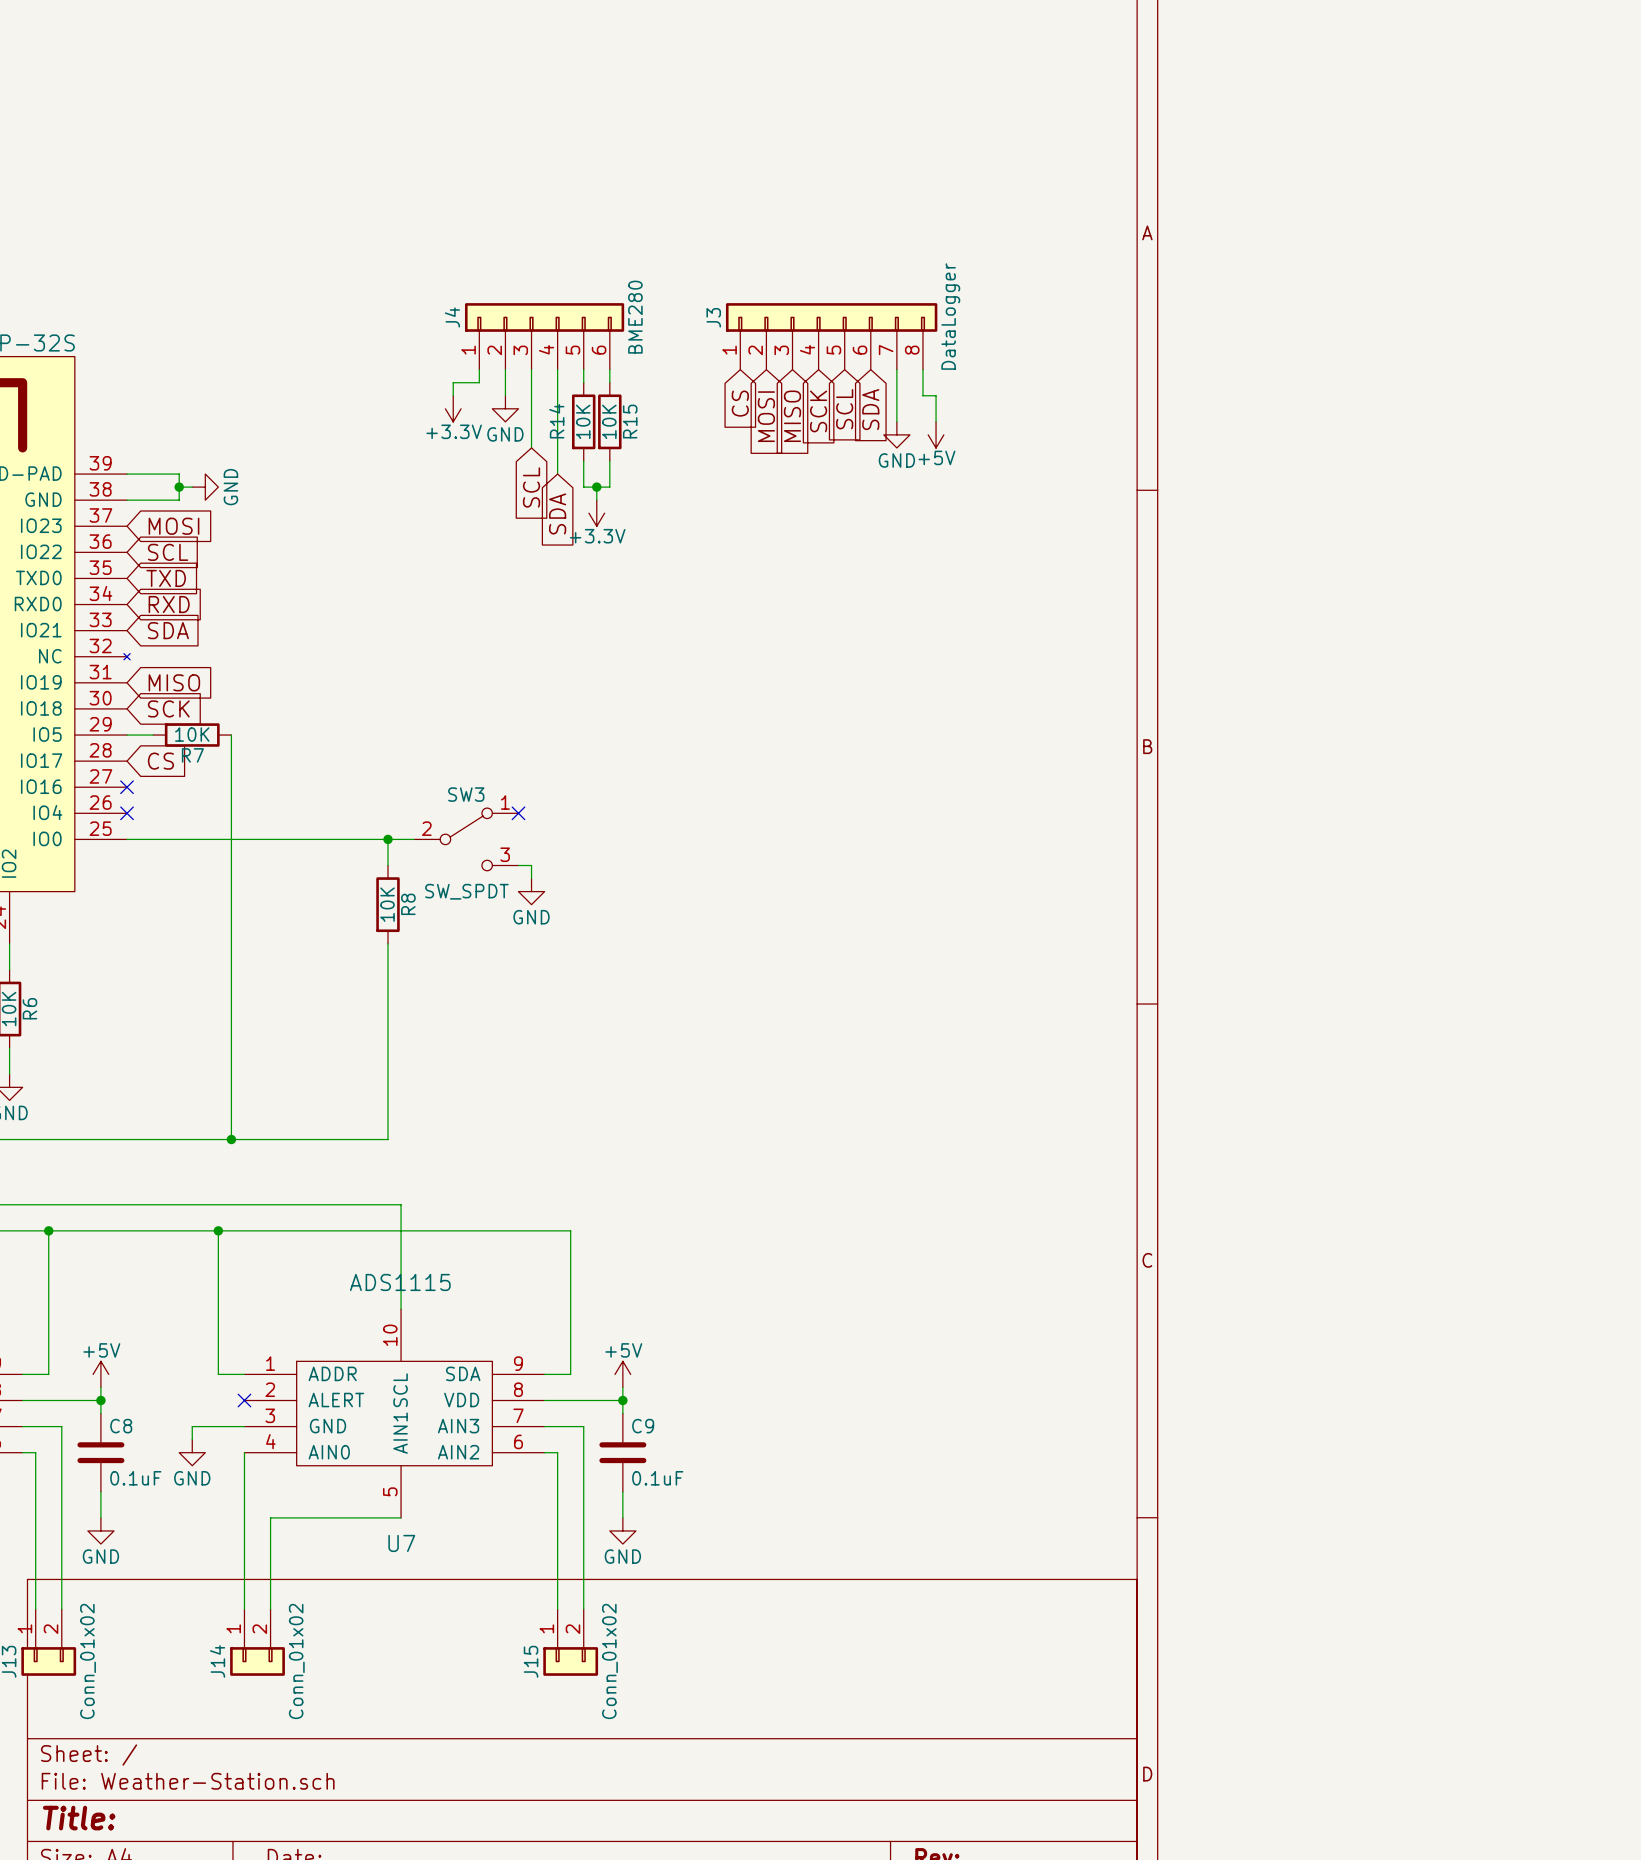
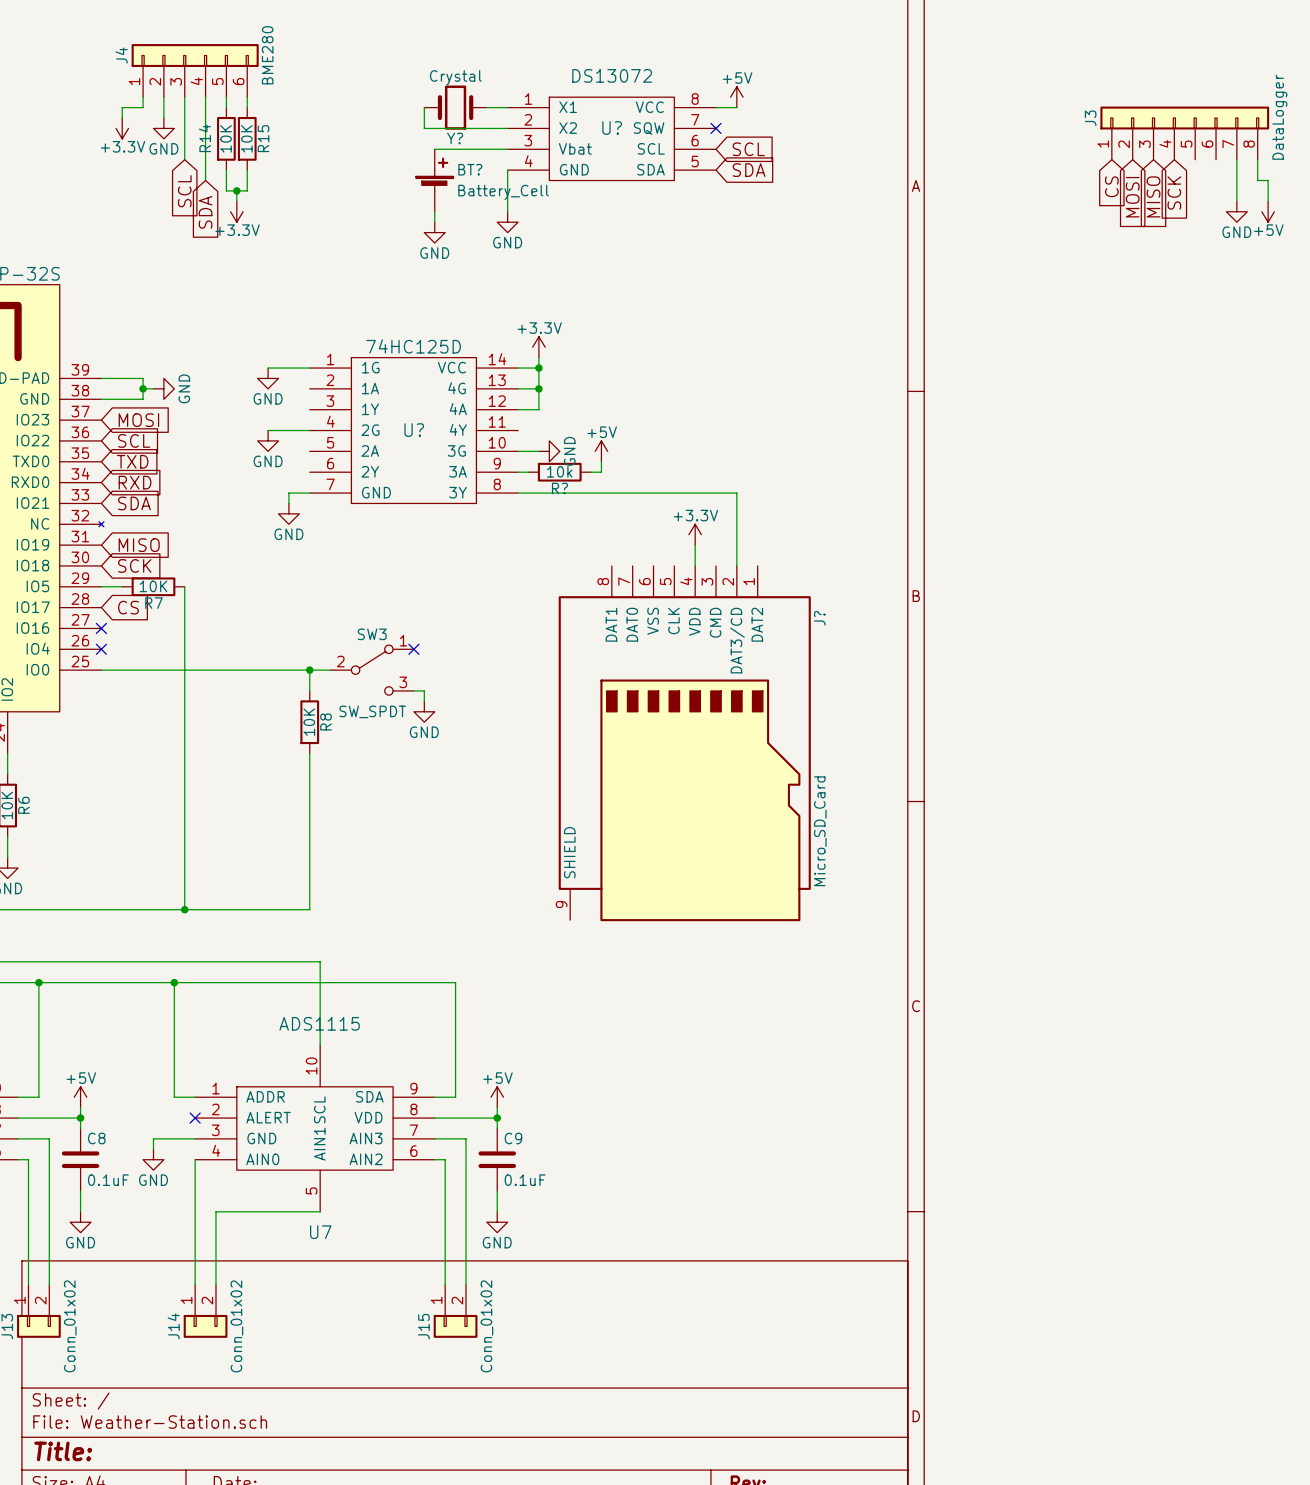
wire: none -> (143, 97) (143, 107) (122, 107) (122, 118)
wire: none -> (163, 97) (163, 118)
wire: none -> (184, 97) (184, 159)
wire: none -> (205, 97) (205, 180)
wire: none -> (226, 97) (226, 107)
wire: none -> (247, 97) (247, 107)
power symbol: none -> +5V (736, 97)
wire: none -> (424, 107) (424, 128) (507, 128)
Y?: none -> Crystal (455, 107)
wire: none -> (486, 107) (507, 107)
wire: none -> (716, 107) (736, 107)
power symbol: none -> +3.3V (122, 128)
power symbol: none -> GND (163, 128)
no-connect mark: none -> (716, 128)
U?: none -> DS13072 (611, 138)
wire: none -> (434, 149) (507, 149)
wire: none -> (1236, 159) (1236, 201)
wire: none -> (1257, 159) (1257, 180) (1268, 180) (1268, 201)
wire: none -> (226, 170) (226, 190) (247, 190) (247, 170)
wire: none -> (507, 170) (507, 211)
BT?: none -> Battery_Cell (434, 180)
global label: none -> CS (1111, 186)
global label: none -> SCL (184, 191)
wire: none -> (236, 190) (236, 201)
junction: none -> (236, 190)
global label: none -> SCK (1174, 193)
global label: none -> MISO (1153, 196)
global label: none -> MOSI (1132, 197)
power symbol: none -> +3.3V (236, 211)
power symbol: none -> GND (1236, 211)
power symbol: none -> +5V (1268, 211)
global label: none -> SDA (205, 212)
power symbol: none -> GND (507, 222)
power symbol: none -> GND (434, 232)
J4 position: (544, 336) -> (195, 70)
J3 position: (831, 336) -> (1184, 133)
wire: (479, 369) (479, 382) (453, 382) (453, 395) -> none
wire: (505, 369) (505, 395) -> none
wire: (531, 369) (531, 447) -> none
wire: (557, 369) (557, 474) -> none
wire: (583, 369) (583, 382) -> (434, 211) (434, 222)
wire: (609, 369) (609, 382) -> none
wire: (896, 369) (896, 421) -> none
wire: (922, 369) (922, 395) (936, 395) (936, 421) -> none
global label: CS (740, 403) -> none
power symbol: +3.3V (453, 408) -> none
power symbol: GND (505, 408) -> none
global label rotation: 0° (844, 409) -> 90° counterclockwise (748, 149)
global label position: SCL (844, 409) -> SCL (748, 149)
global label rotation: 0° (870, 409) -> 90° counterclockwise (749, 170)
global label position: SDA (870, 409) -> SDA (749, 170)
global label: SCK (818, 411) -> none
global label: MOSI (766, 416) -> none
global label: MISO (792, 416) -> none
R14 position: (583, 421) -> (226, 138)
R15 position: (609, 421) -> (247, 138)
power symbol: GND (896, 434) -> none
power symbol: +5V (936, 434) -> none
wire: none -> (538, 357) (538, 409) (518, 409)
wire: none -> (268, 368) (309, 368)
wire: (583, 461) (583, 487) (609, 487) (609, 461) -> none
wire: none -> (518, 368) (538, 368)
junction: none -> (538, 368)
power symbol: none -> GND (268, 378)
global label: SCL (531, 487) -> none
junction: (596, 487) -> none
wire: none -> (518, 388) (538, 388)
junction: none -> (538, 388)
global label: SDA (557, 513) -> none
power symbol rotation: 0° (596, 513) -> 180° (538, 347)
power symbol position: +3.3V (596, 513) -> +3.3V (538, 347)
wire: none -> (268, 430) (309, 430)
U?: none -> 74HC125D (413, 430)
power symbol: none -> GND (268, 440)
wire: none -> (518, 451) (538, 451)
power symbol: none -> GND (549, 451)
power symbol: none -> +5V (601, 451)
wire: none -> (601, 461) (601, 472) (591, 472)
wire: none -> (518, 472) (528, 472)
R?: none -> 10k (559, 472)
wire: none -> (309, 493) (288, 493) (288, 503)
wire: none -> (518, 493) (736, 493) (736, 565)
power symbol: none -> GND (288, 513)
power symbol: none -> +3.3V (695, 534)
wire: none -> (695, 545) (695, 565)
J?: none -> Micro_SD_Card (684, 743)

